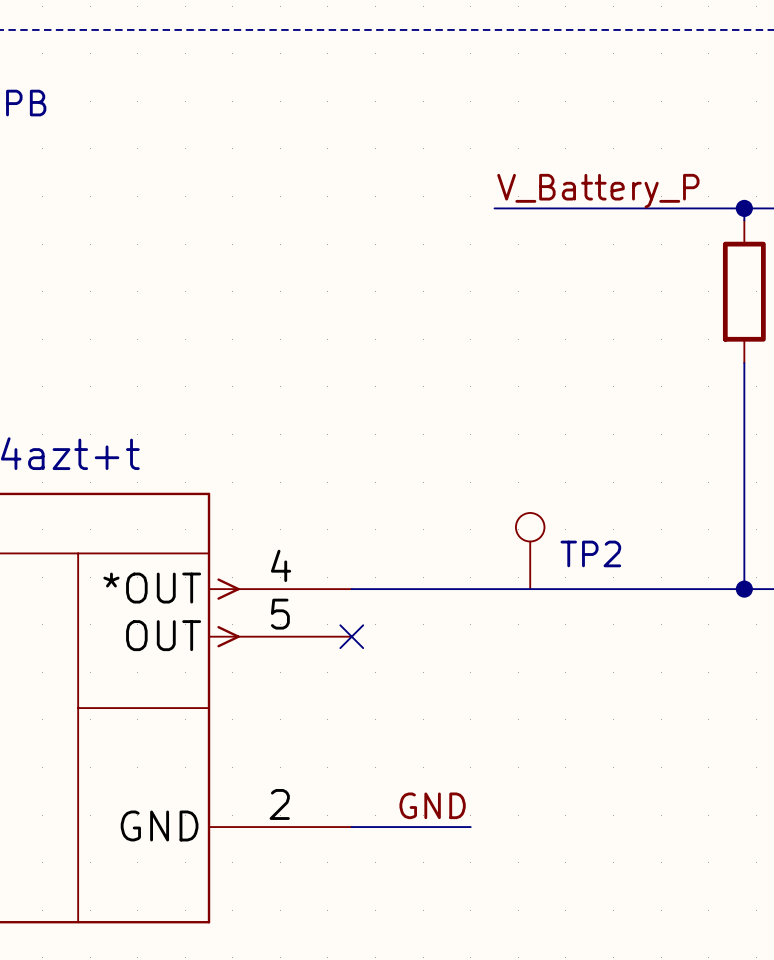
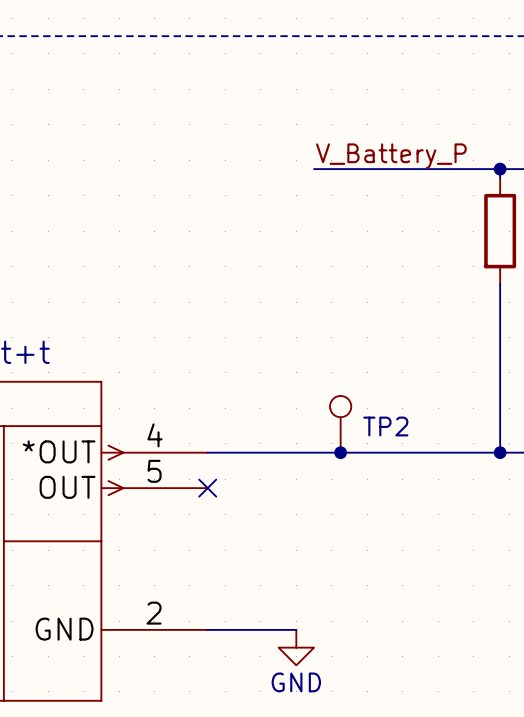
junction: none -> (340, 452)
label: GND (432, 805) -> none
power symbol: none -> GND (296, 647)

